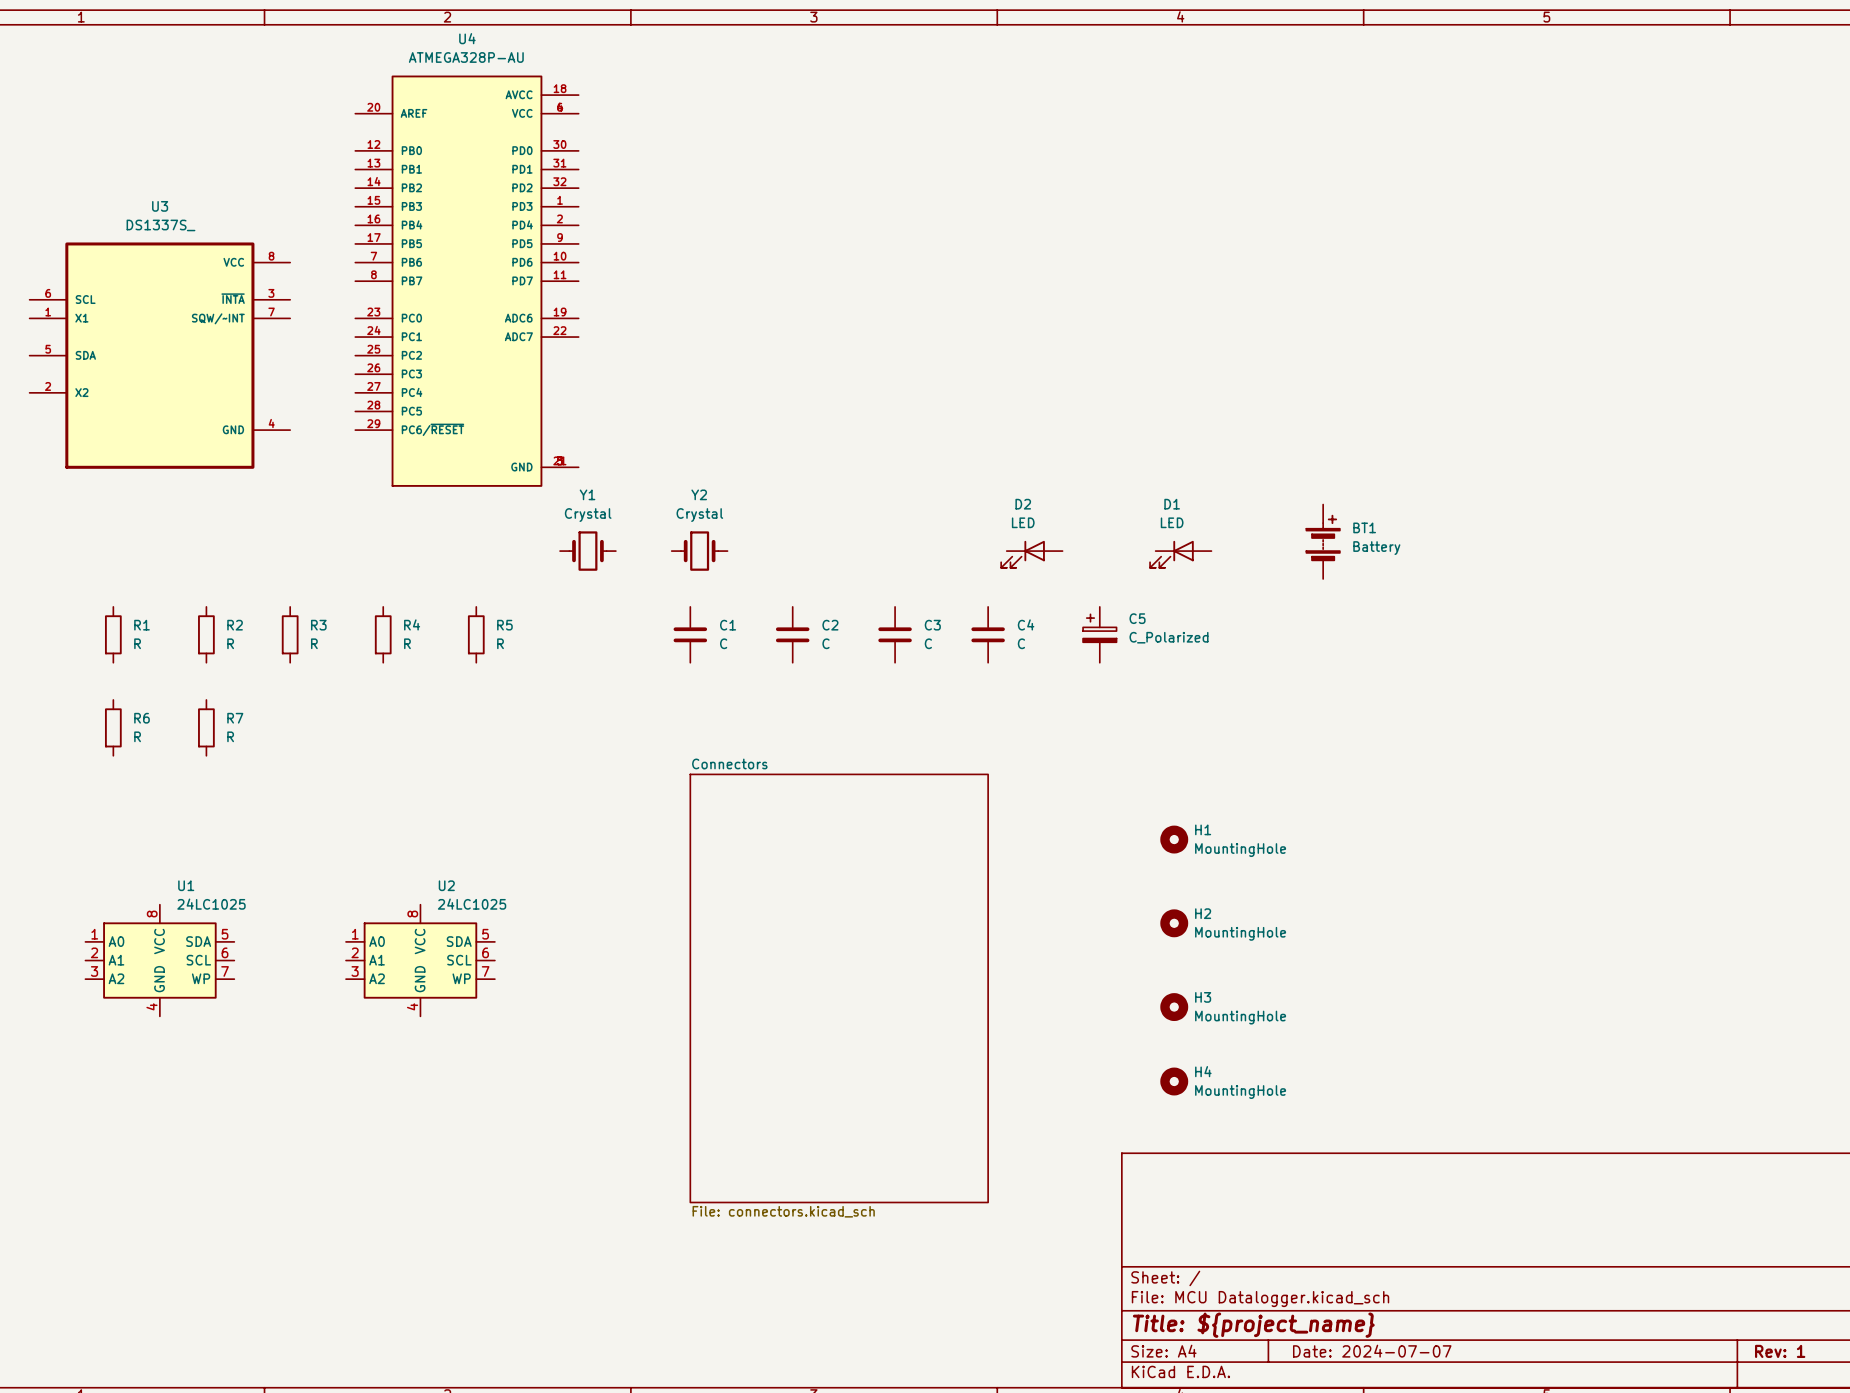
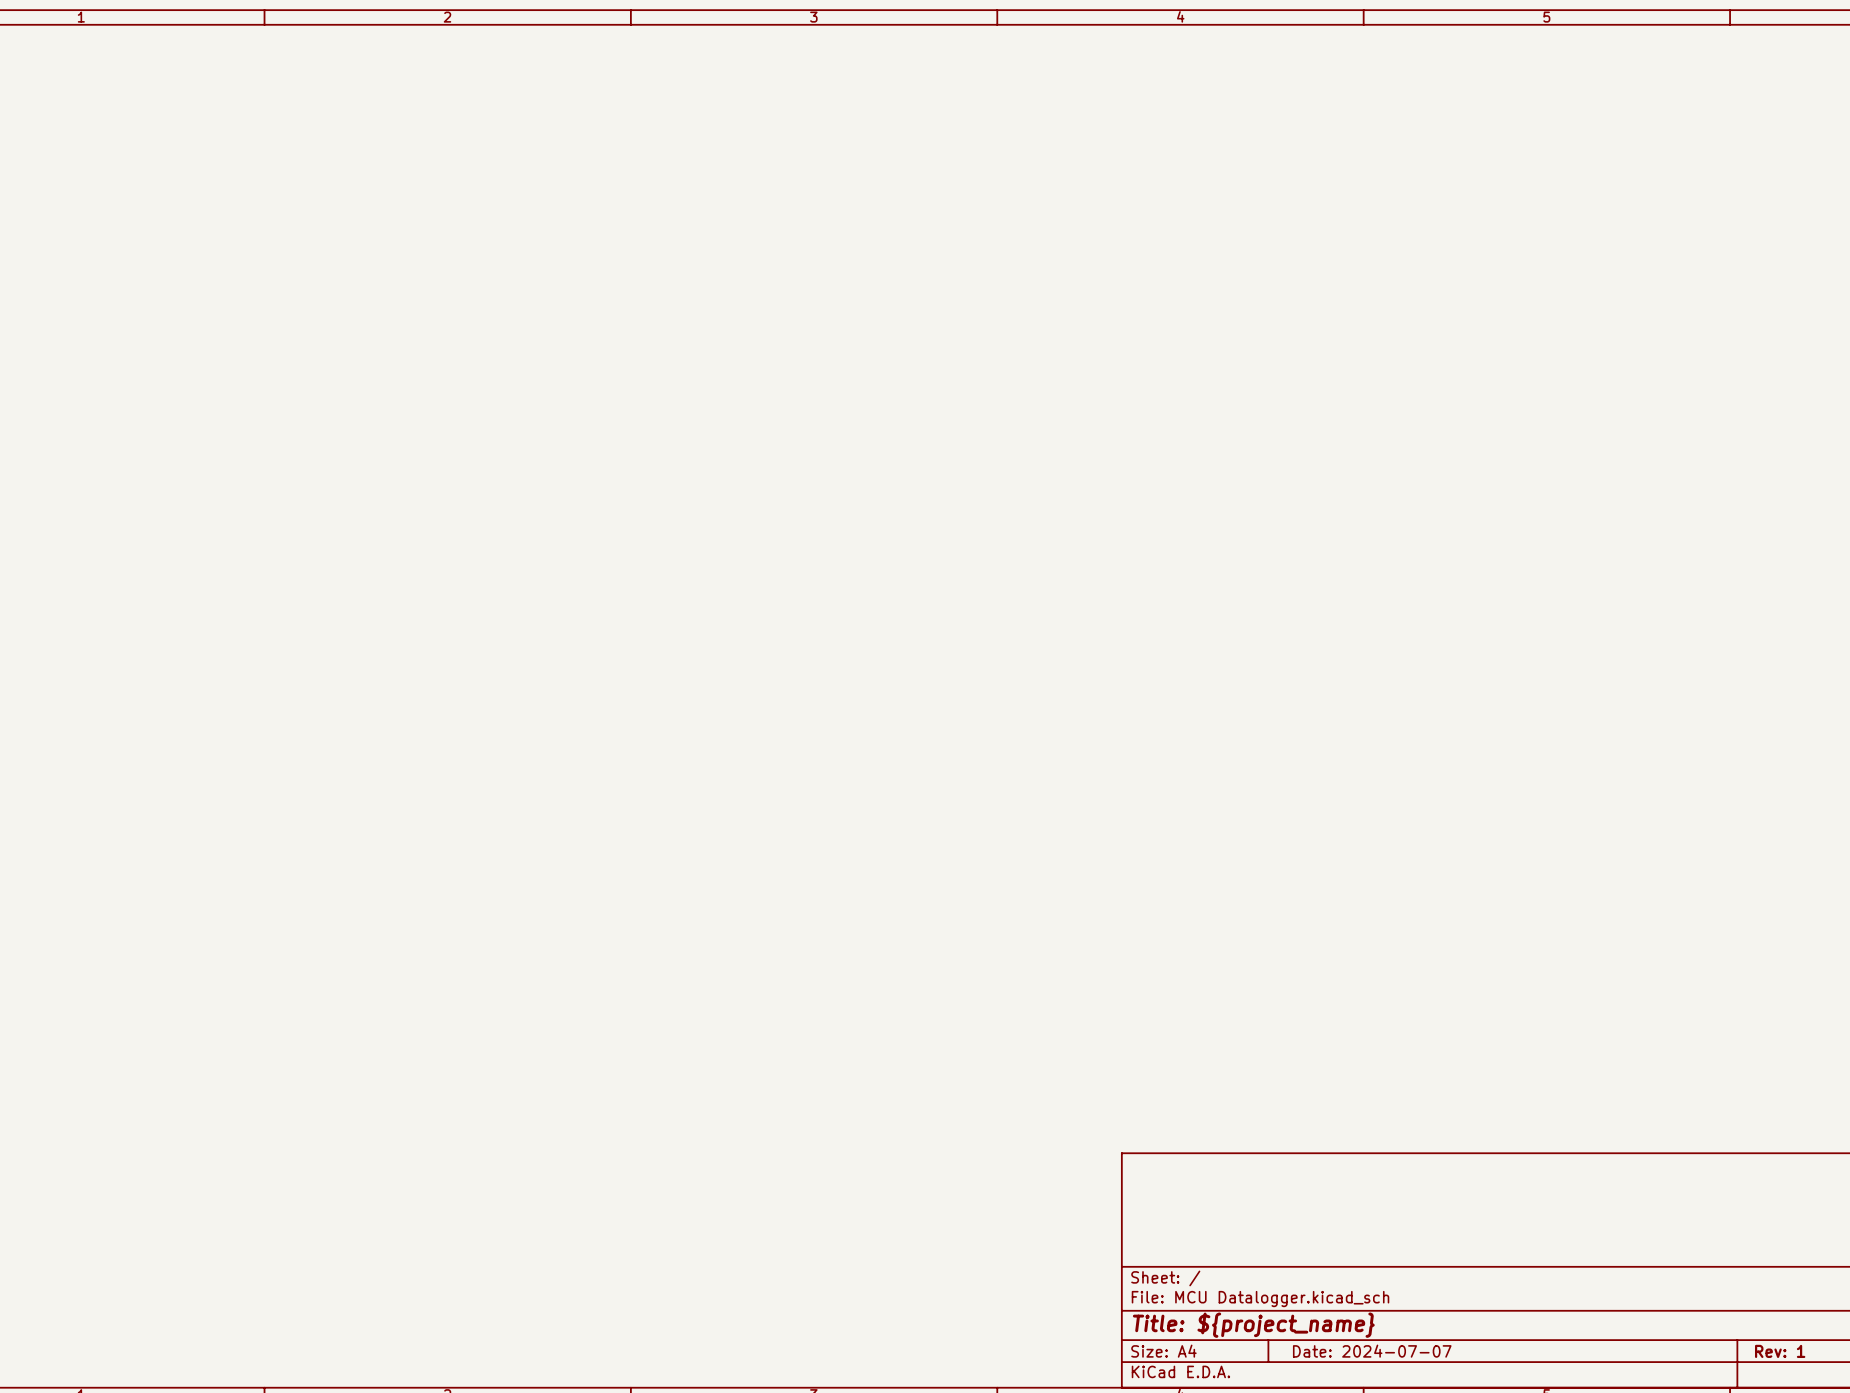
U4: ATMEGA328P-AU (466, 281) -> none
U3: DS1337S_ (159, 355) -> none
BT1: Battery (1323, 541) -> none
Y1: Crystal (587, 551) -> none
Y2: Crystal (699, 551) -> none
D2: LED (1031, 554) -> none
D1: LED (1180, 554) -> none
R1: R (113, 634) -> none
R2: R (206, 634) -> none
R3: R (290, 634) -> none
R4: R (383, 634) -> none
R5: R (476, 634) -> none
C1: C (690, 634) -> none
C2: C (792, 634) -> none
C3: C (895, 634) -> none
C4: C (988, 634) -> none
C5: C_Polarized (1099, 634) -> none
R6: R (113, 727) -> none
R7: R (206, 727) -> none
H1: MountingHole (1174, 839) -> none
H2: MountingHole (1174, 923) -> none
U1: 24LC1025 (159, 960) -> none
U2: 24LC1025 (420, 960) -> none
sheet Connectors: File: connectors.kicad_sch (839, 988) -> none
H3: MountingHole (1174, 1007) -> none
H4: MountingHole (1174, 1081) -> none

